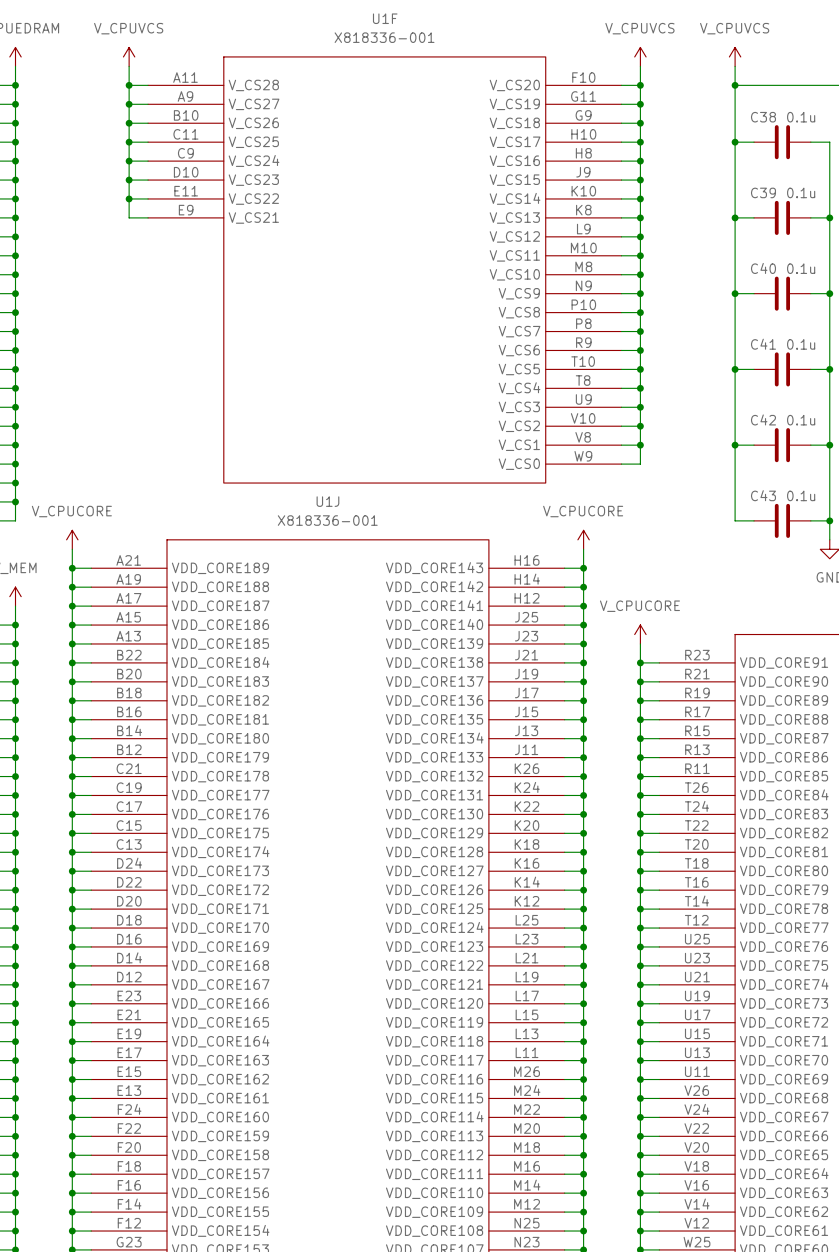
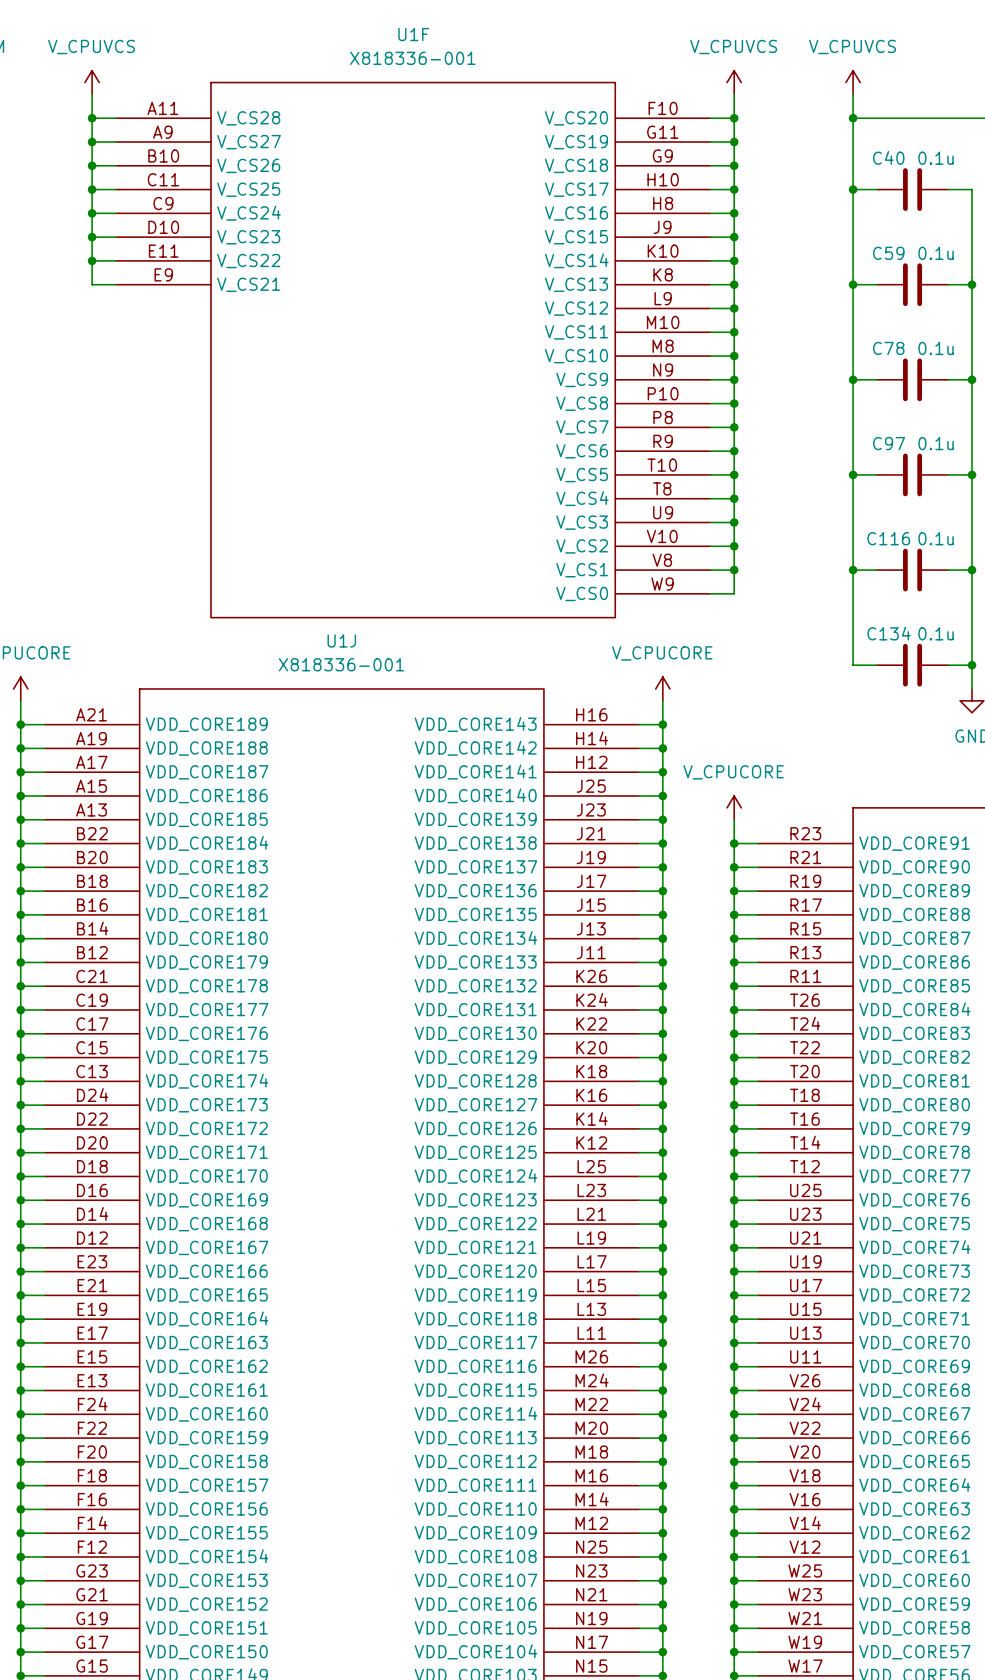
C38 name: C38 (763, 117) -> C40 (888, 157)
C39 name: C39 (763, 192) -> C59 (888, 253)
C40 name: C40 (763, 268) -> C78 (888, 348)
C41 name: C41 (763, 344) -> C97 (889, 443)
C42 name: C42 (763, 419) -> C116 (888, 538)
C43 name: C43 (763, 495) -> C134 (889, 633)

